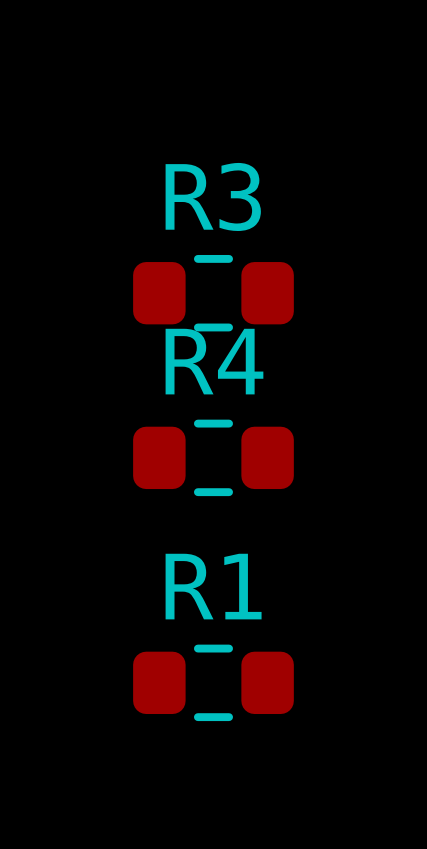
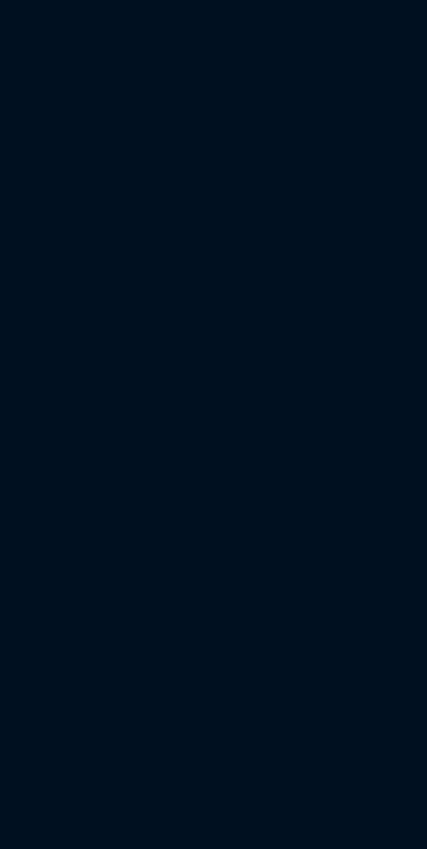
R3: (213, 293) -> none
R4: (213, 457) -> none
R1: (213, 682) -> none

